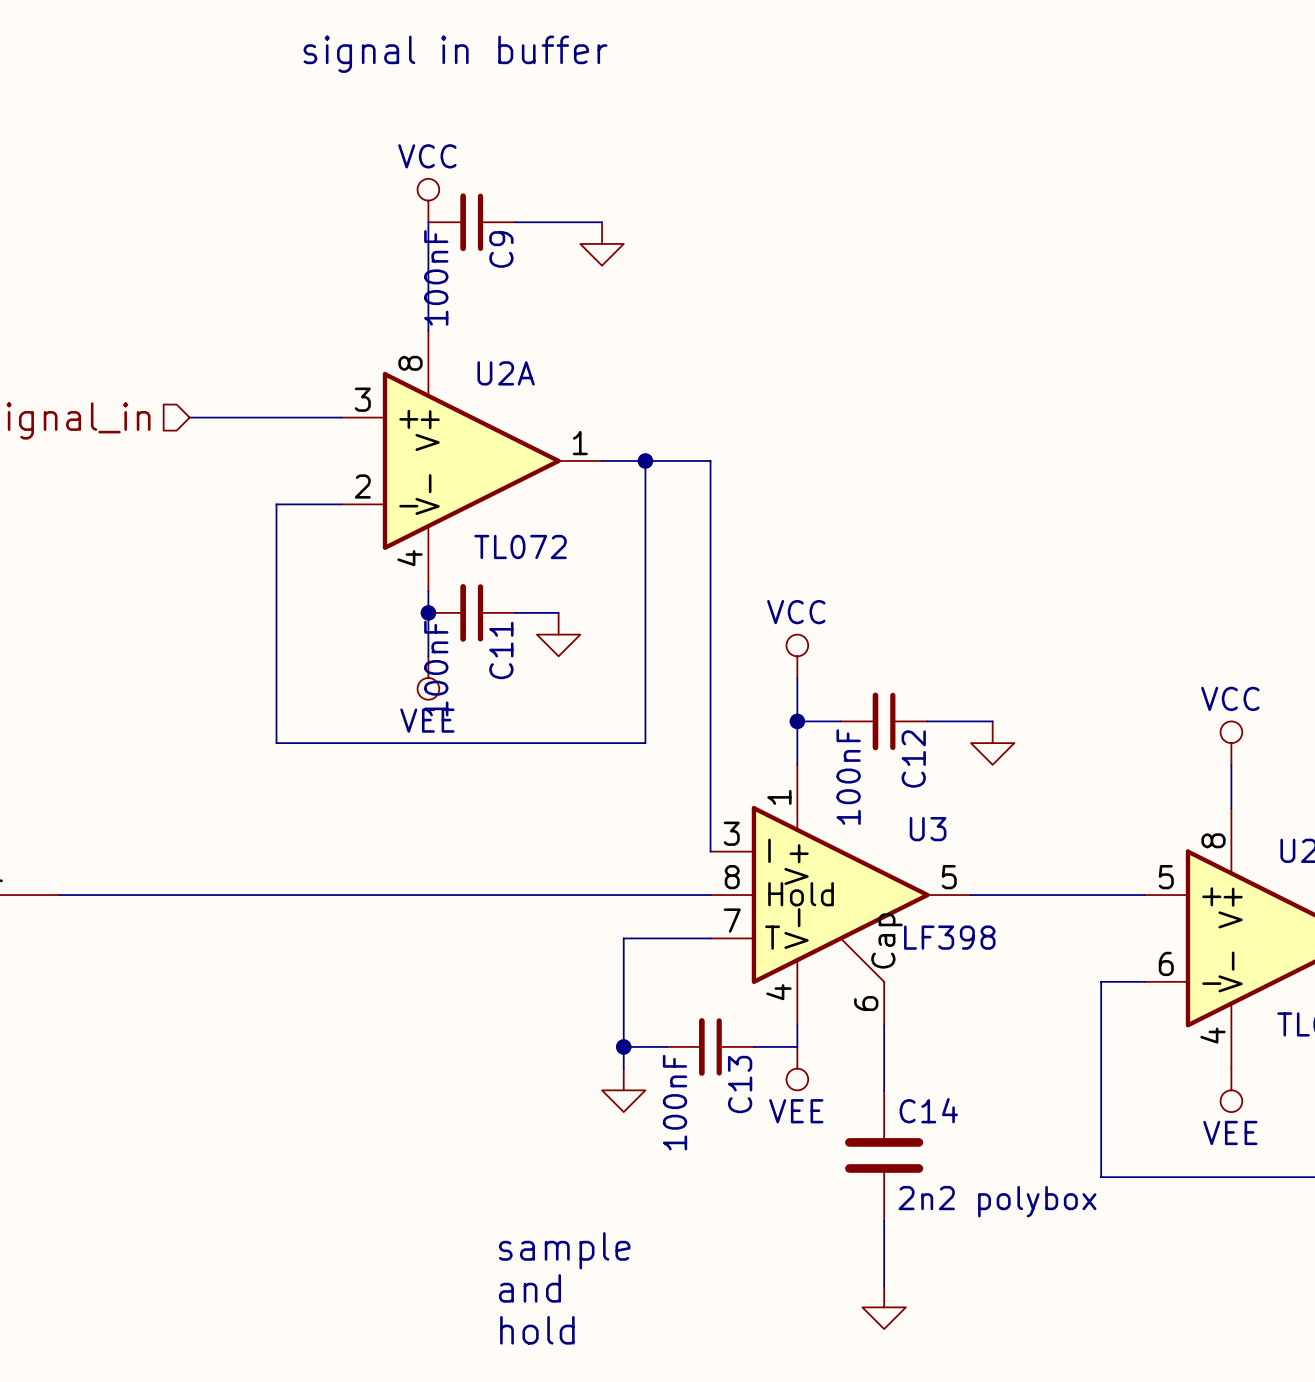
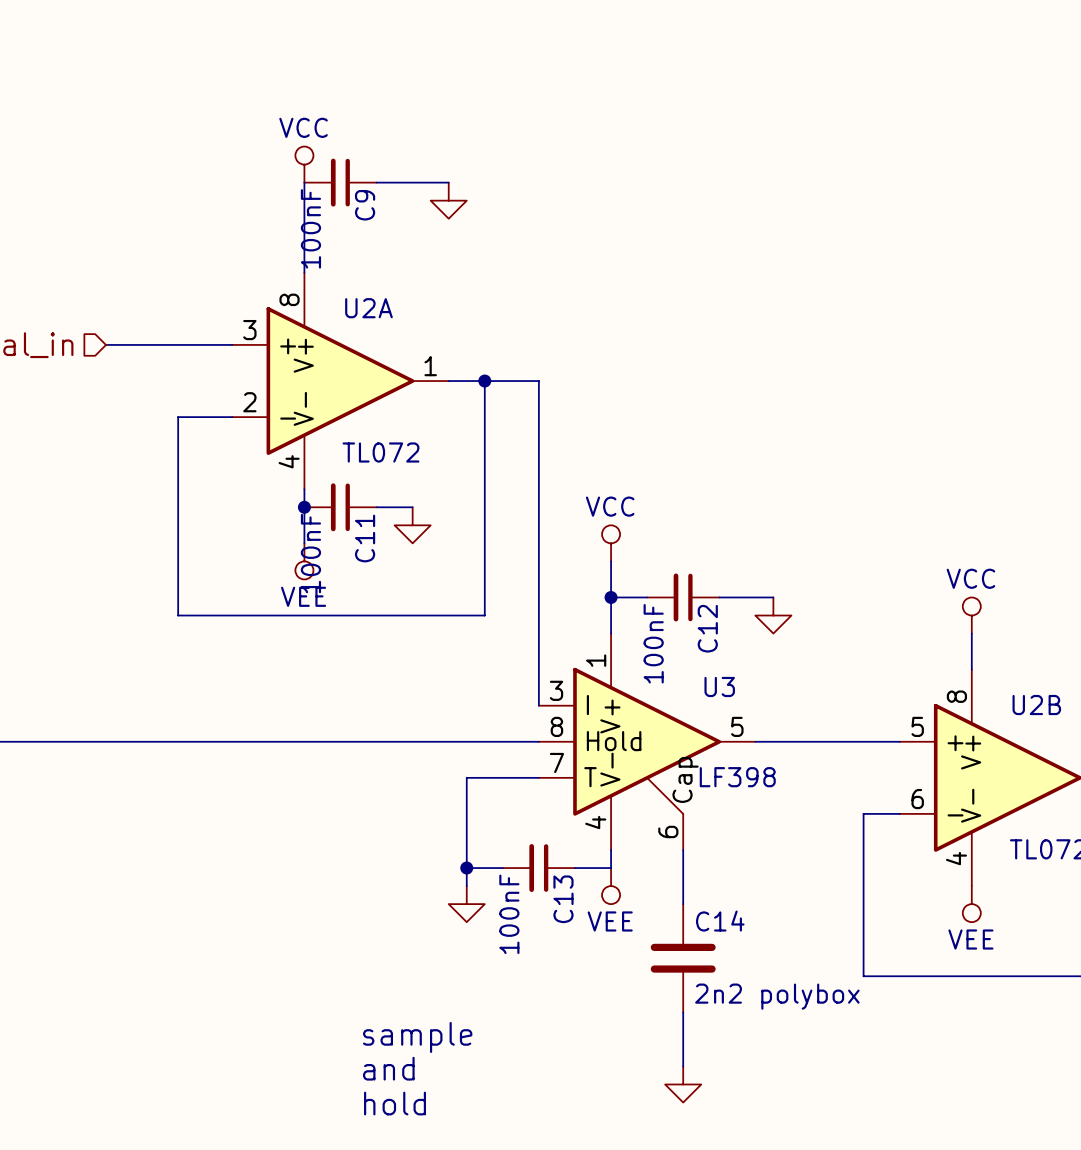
text: signal in buffer (455, 54) -> none

